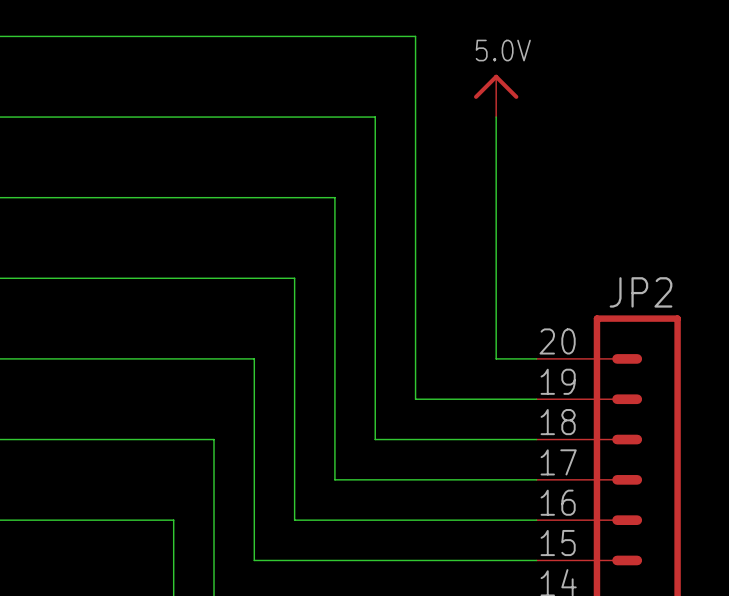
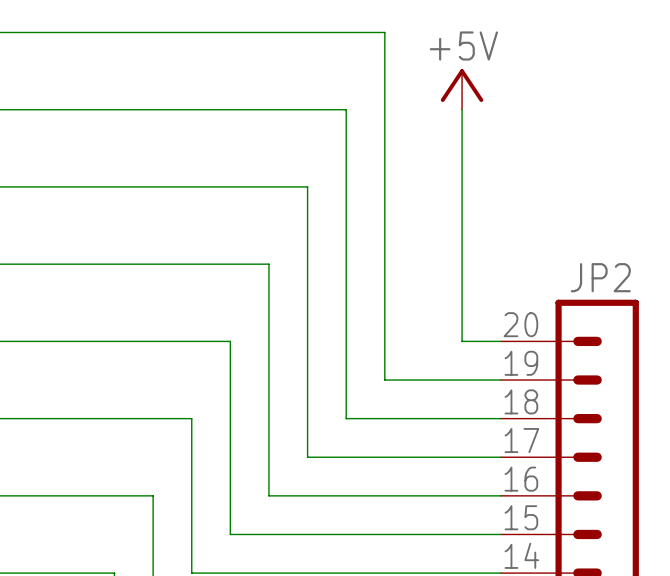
power symbol: 5.0V (496, 95) -> +5V (462, 89)

